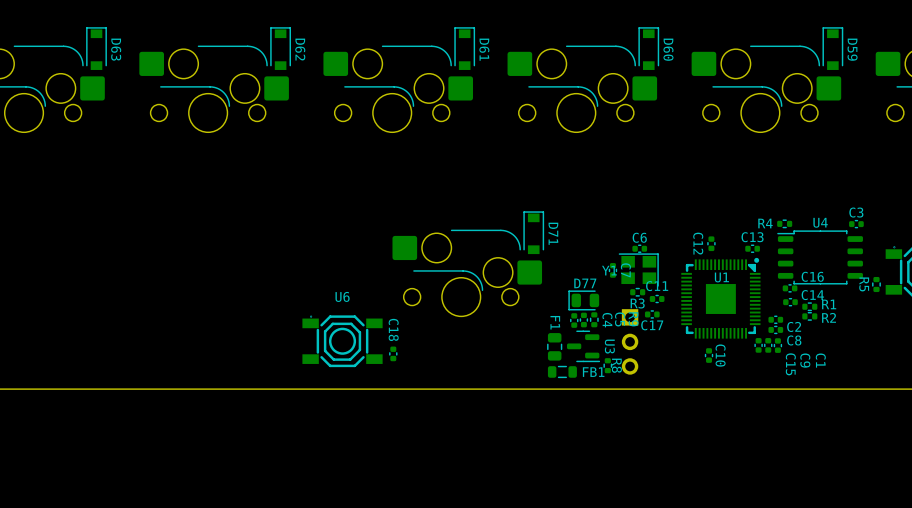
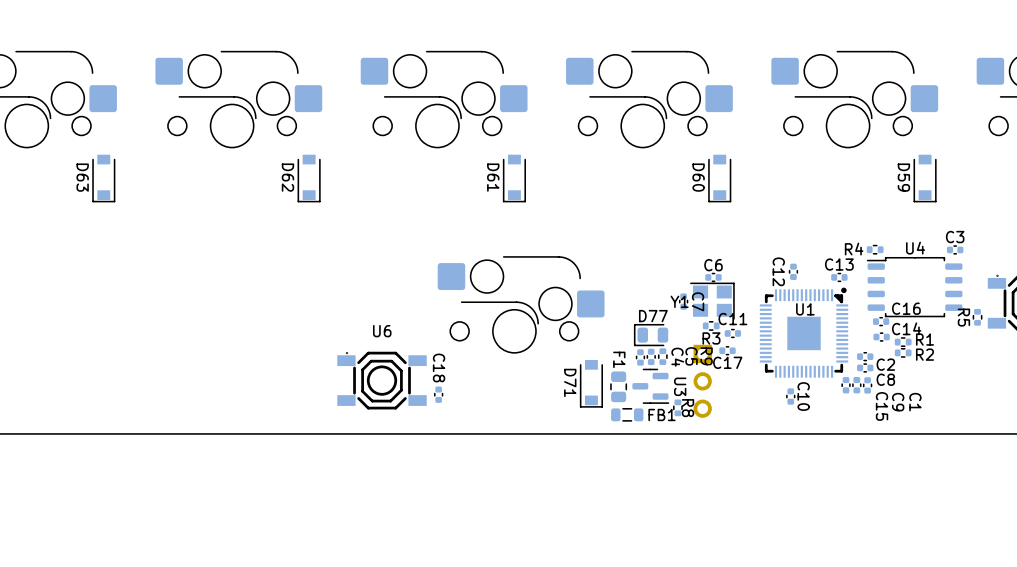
D63 rotation: 0° (96, 48) -> 180° (103, 178)
D63 position: (96, 48) -> (103, 178)
D62 rotation: 0° (280, 48) -> 180° (309, 178)
D62 position: (280, 48) -> (309, 178)
D61 rotation: 0° (464, 48) -> 180° (514, 178)
D61 position: (464, 48) -> (514, 178)
D60 rotation: 0° (648, 48) -> 180° (719, 178)
D60 position: (648, 48) -> (719, 178)
D59 rotation: 0° (832, 48) -> 180° (925, 178)
D59 position: (832, 48) -> (925, 178)
D71 rotation: 0° (533, 232) -> 180° (591, 383)
D71 position: (533, 232) -> (591, 383)

